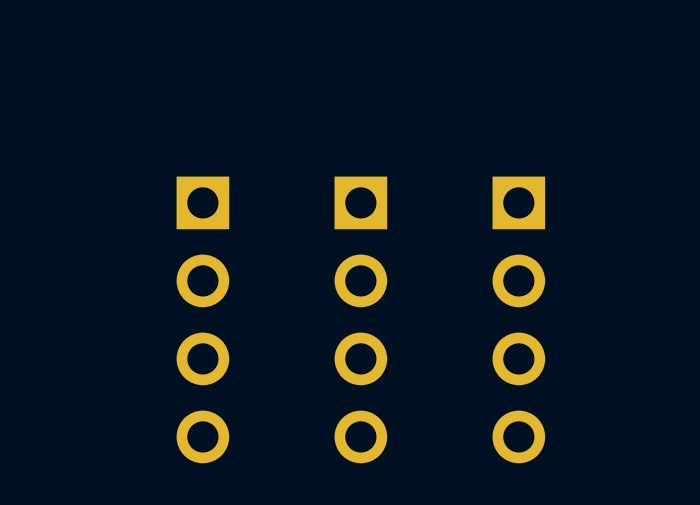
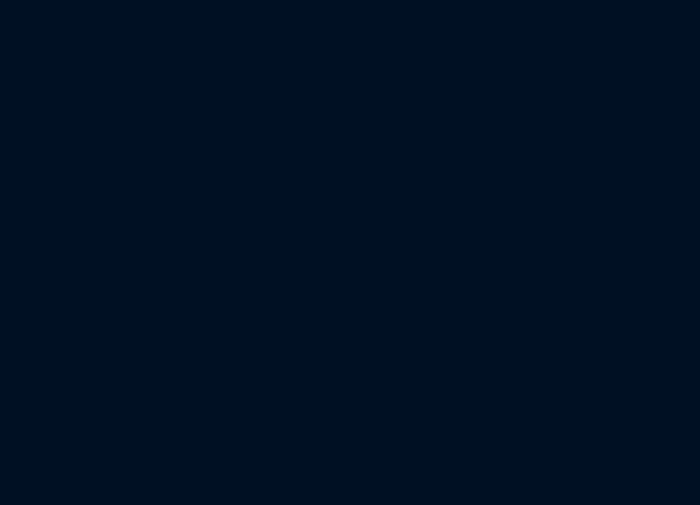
part: (202, 319) -> none
part: (360, 319) -> none
part: (518, 319) -> none

